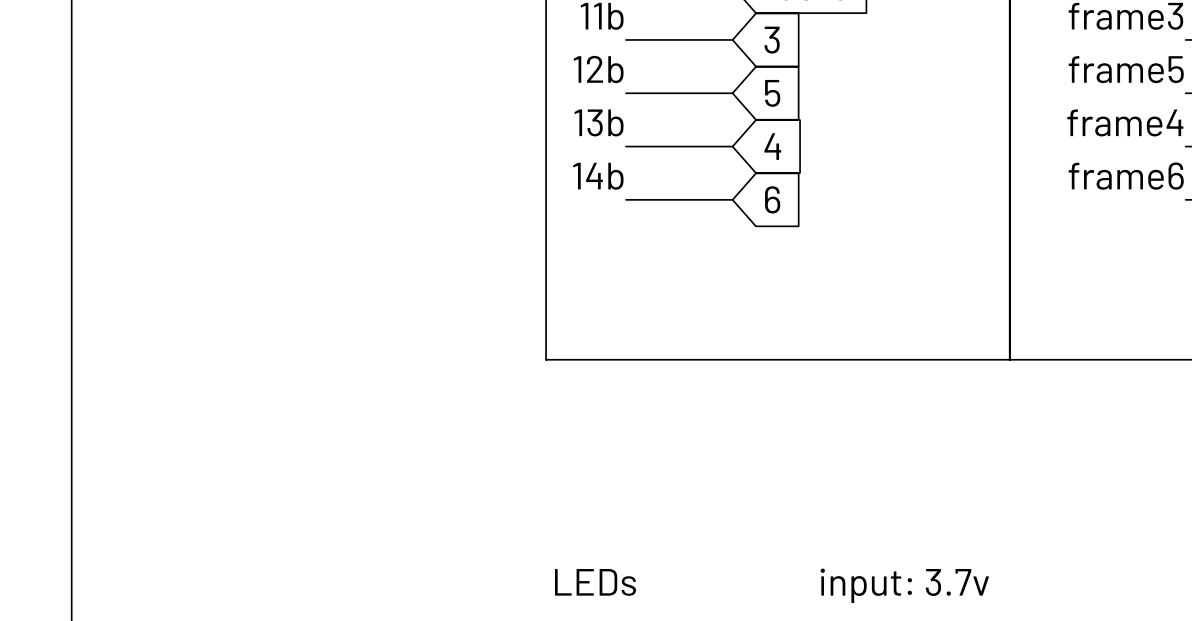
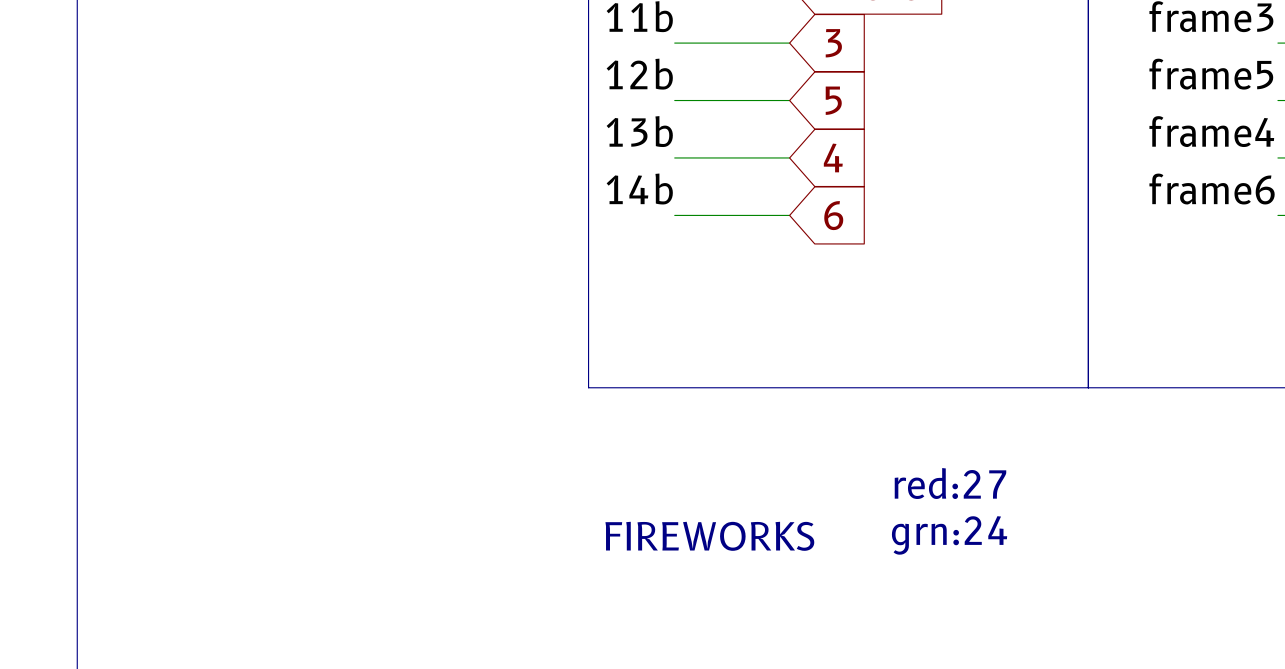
text: none -> red:27 (950, 483)
text: none -> grn:24 (949, 535)
text: none -> FIREWORKS (709, 536)
text: LEDs (595, 582) -> none
text: input: 3.7v (904, 585) -> none

